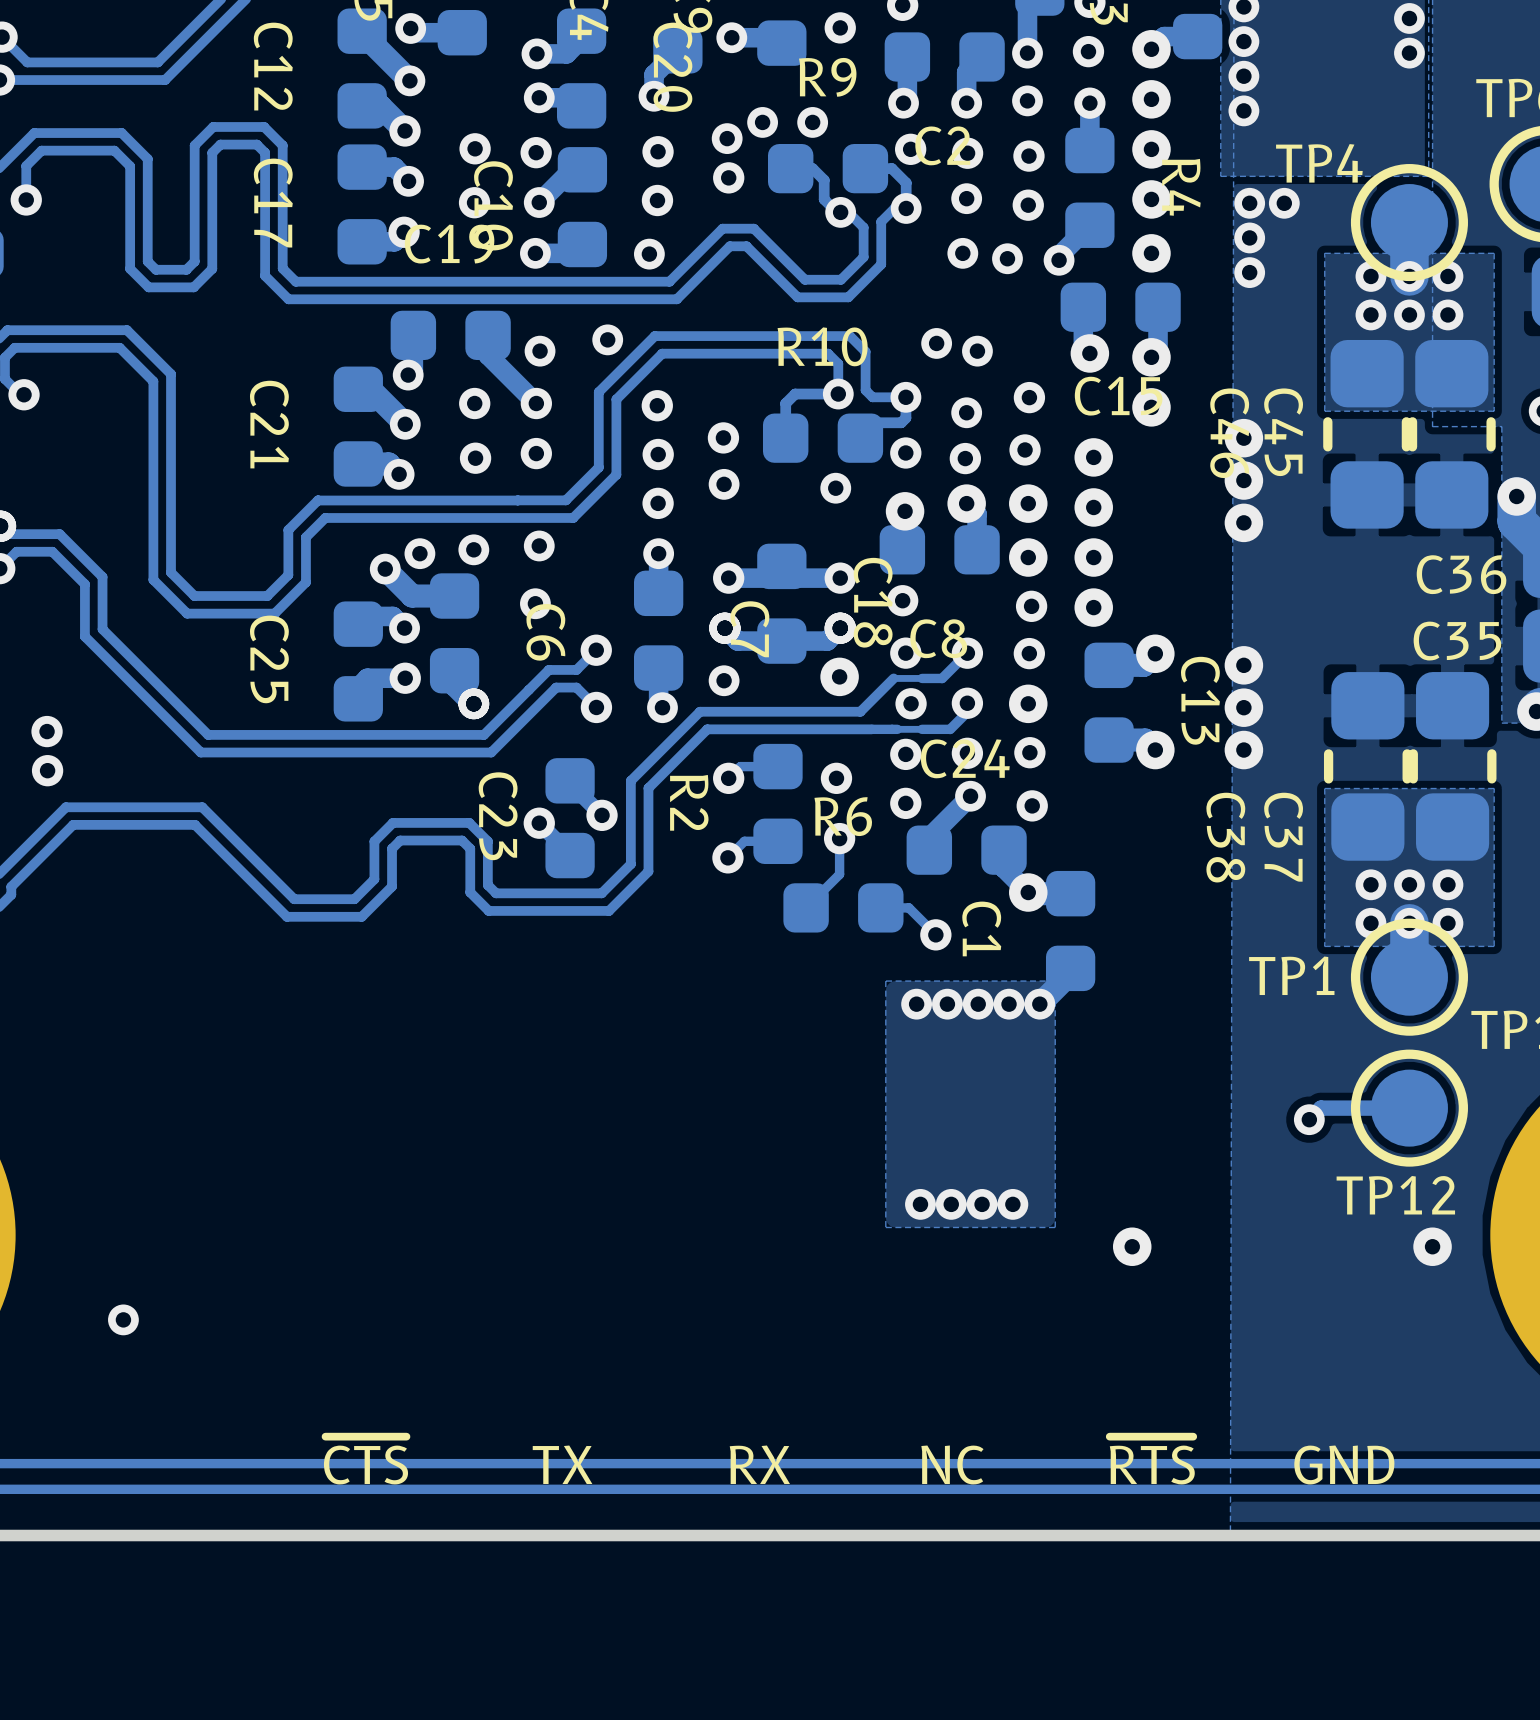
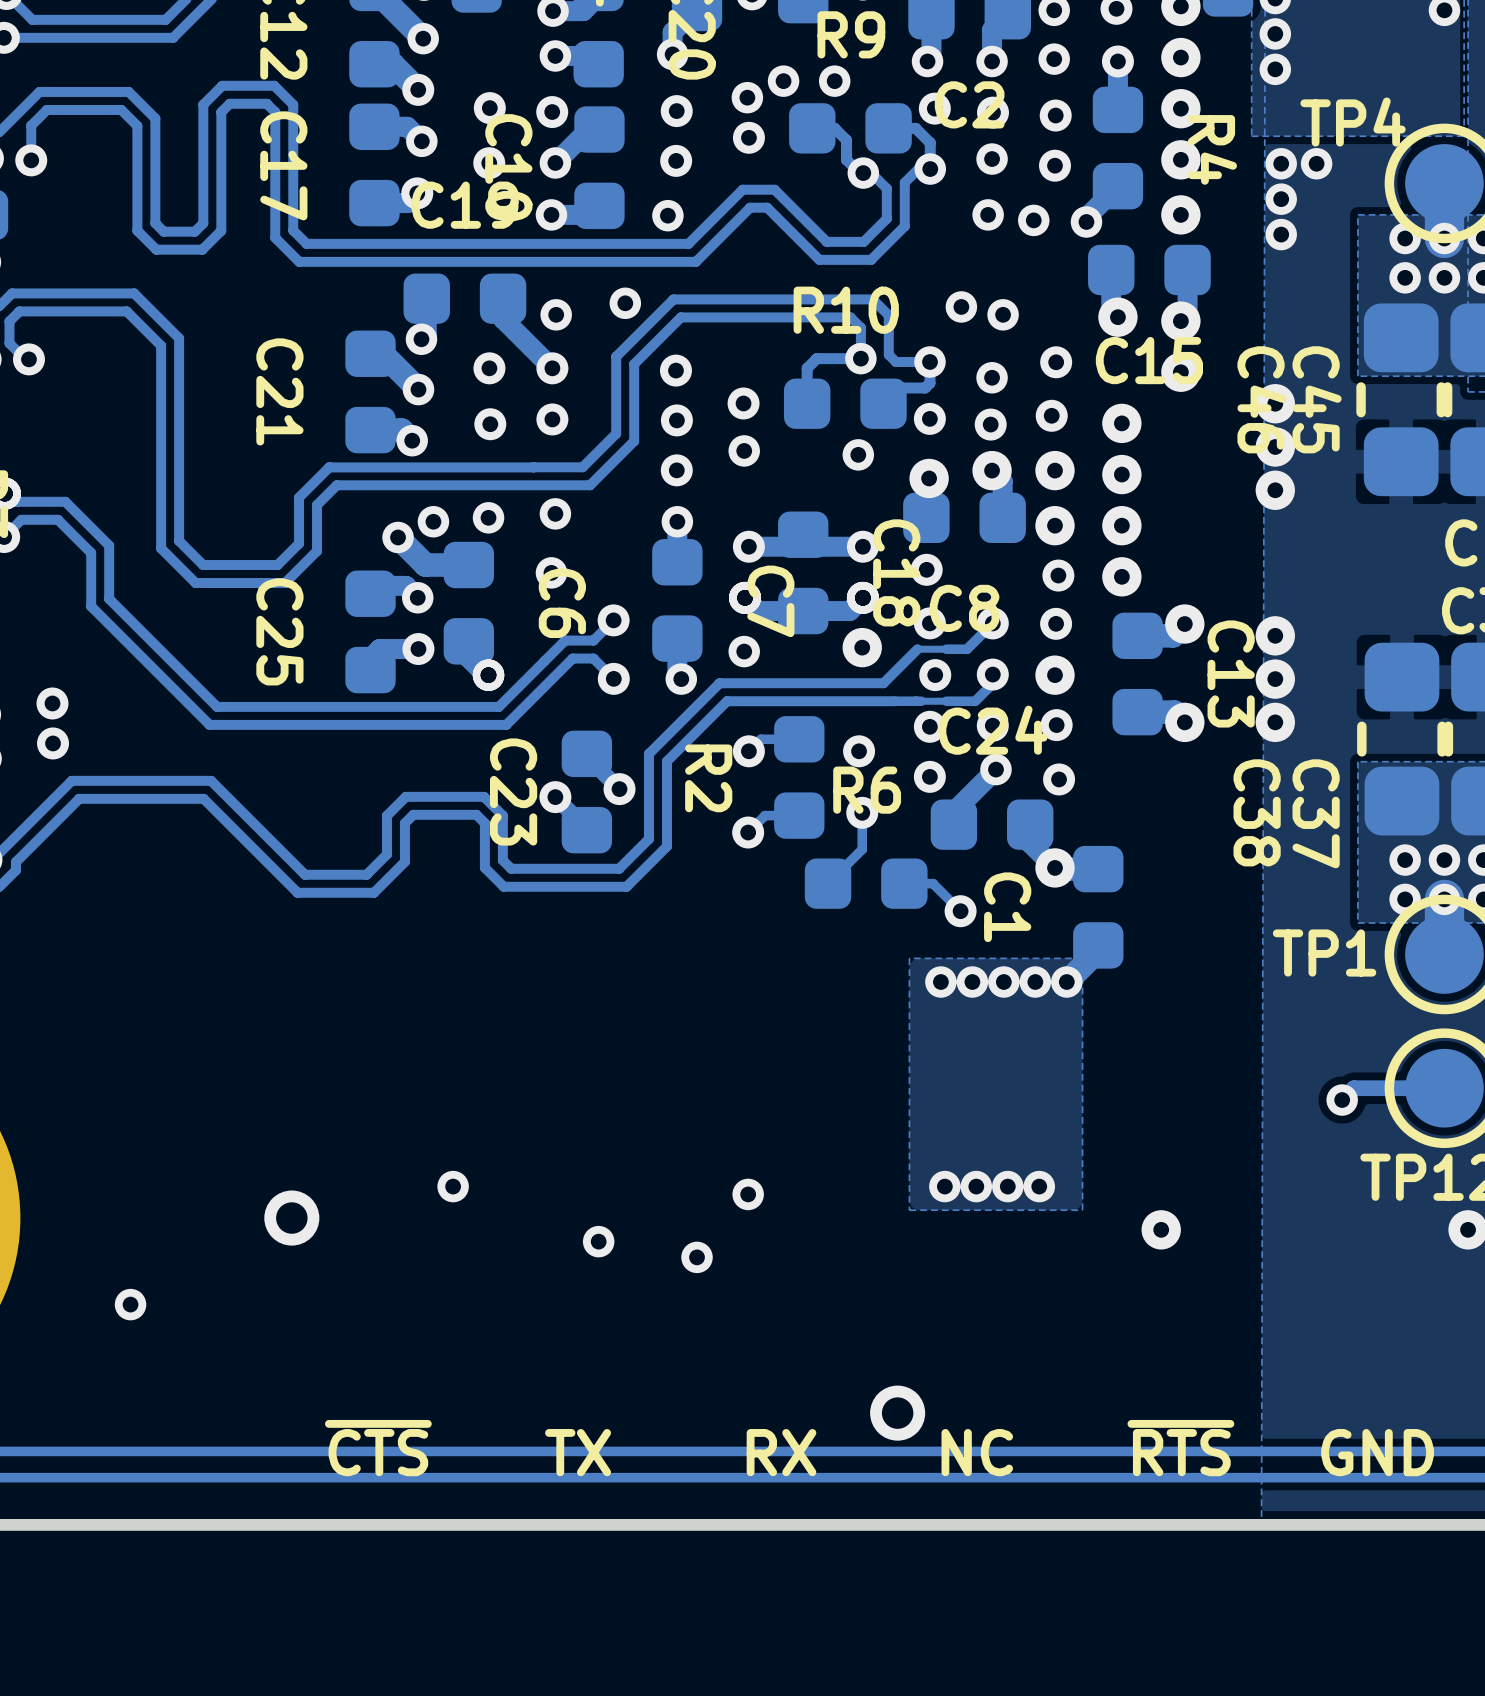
via: none -> (453, 1186)
via: none -> (748, 1194)
via: none -> (291, 1218)
via: none -> (598, 1241)
via: none -> (697, 1257)
via: none -> (897, 1413)

